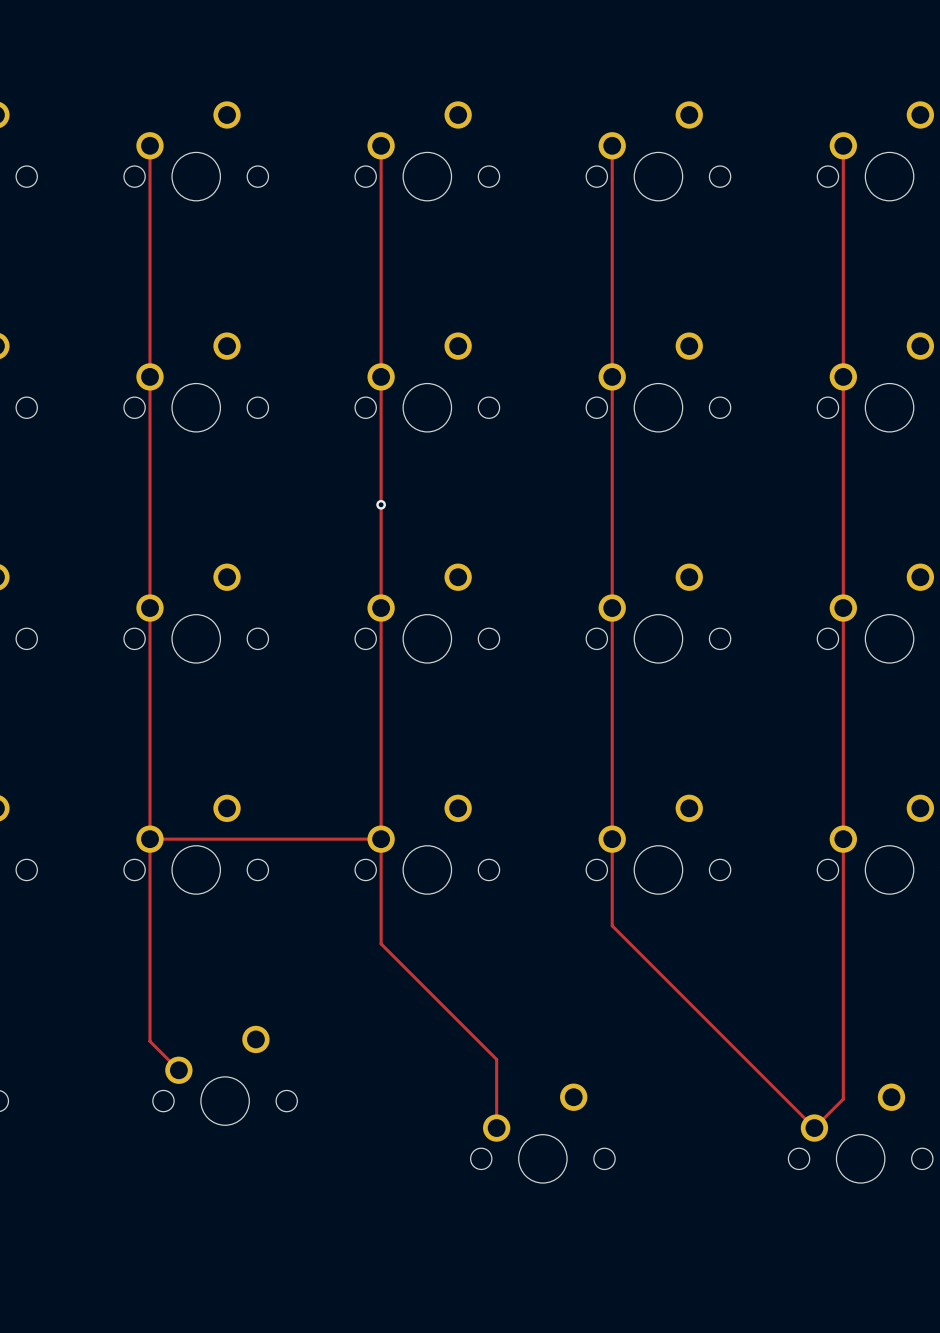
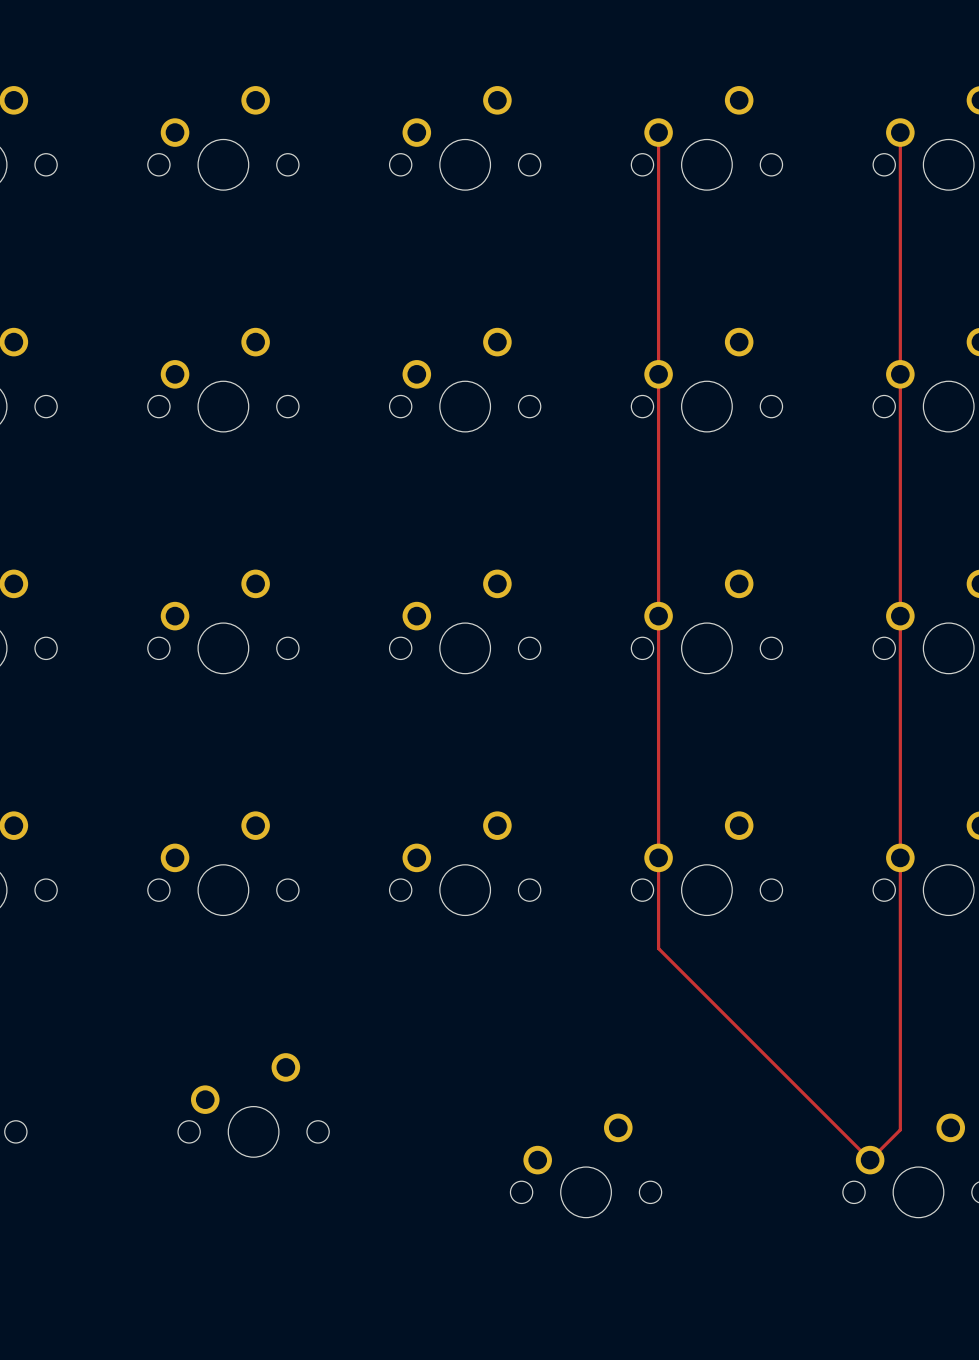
track: (149, 145) (149, 1041) (178, 1070) -> none
track: (381, 145) (381, 943) (496, 1059) (496, 1128) -> none
via: (381, 504) -> none
track: (149, 839) (381, 839) -> none

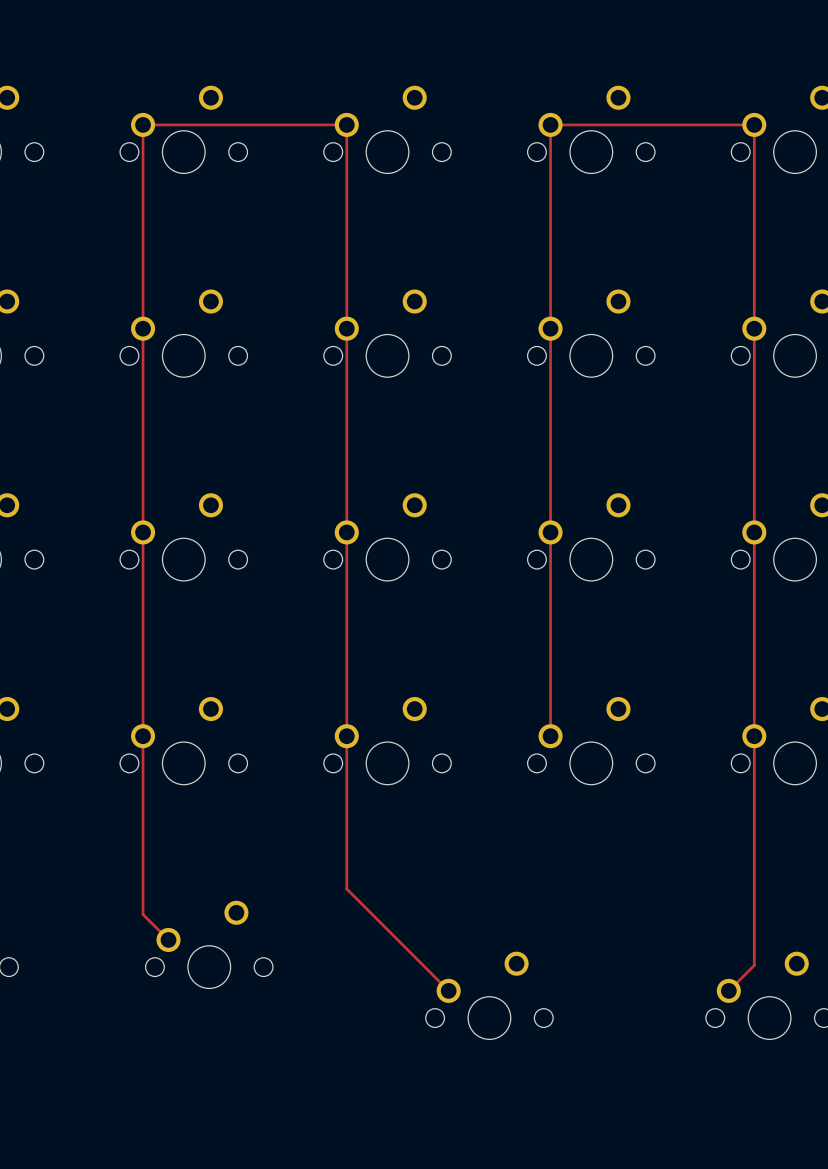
track: none -> (550, 124) (754, 124)
track: (658, 857) (658, 948) (870, 1160) -> none
track: none -> (168, 934) (168, 939) (143, 914) (143, 124) (346, 124) (346, 889) (448, 990)

